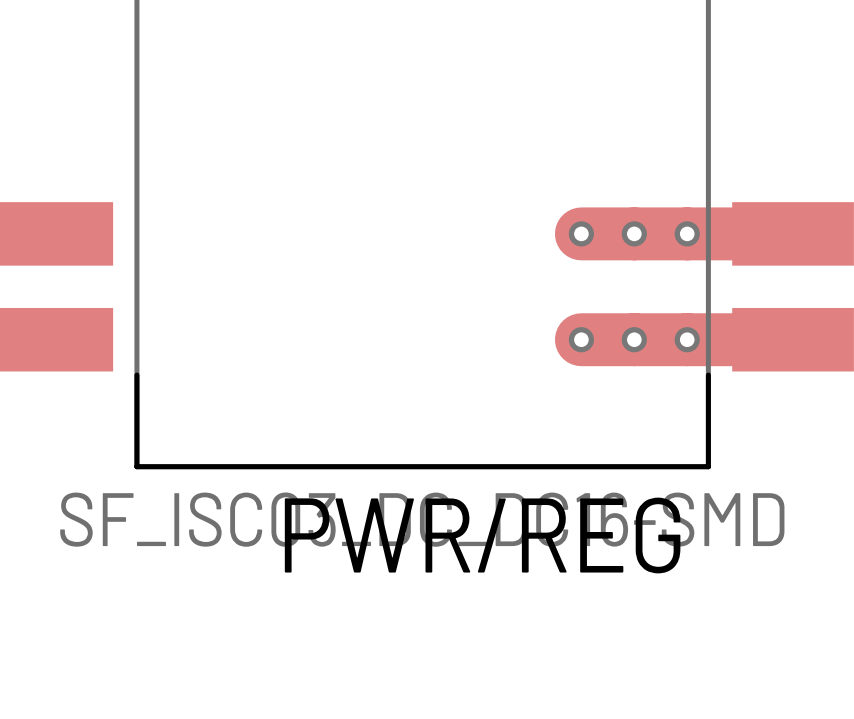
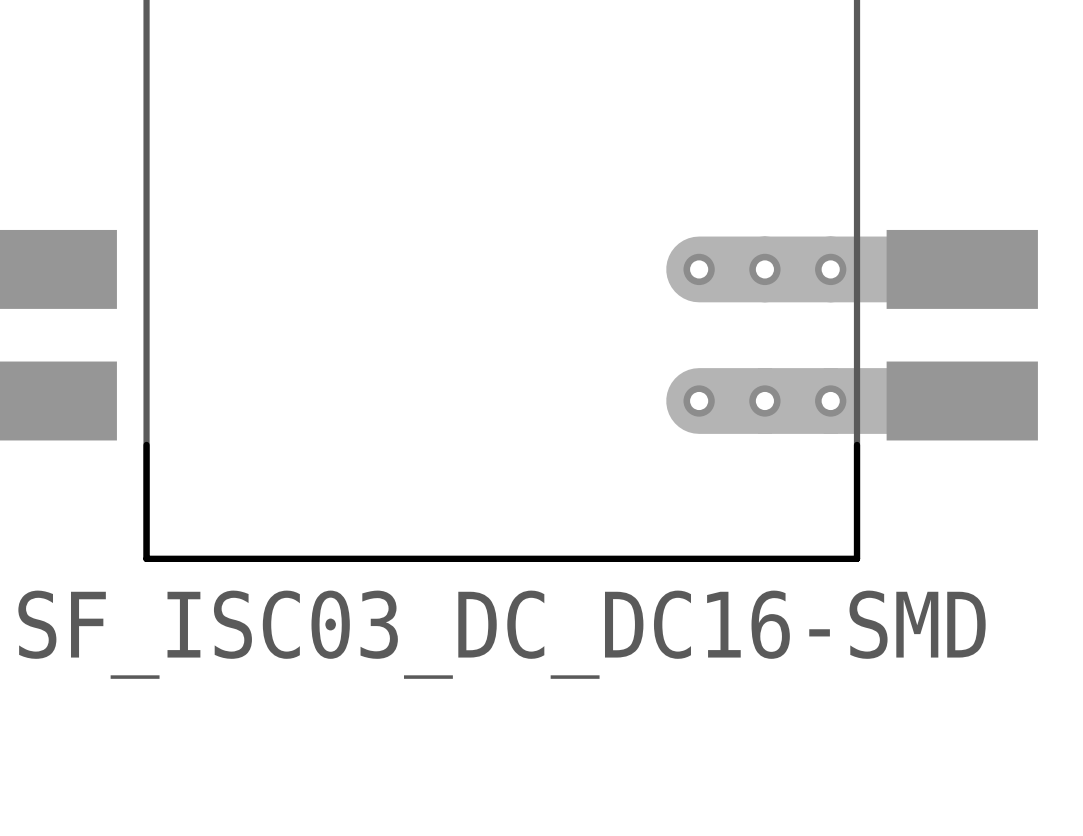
text: PWR/REG (482, 535) -> none

